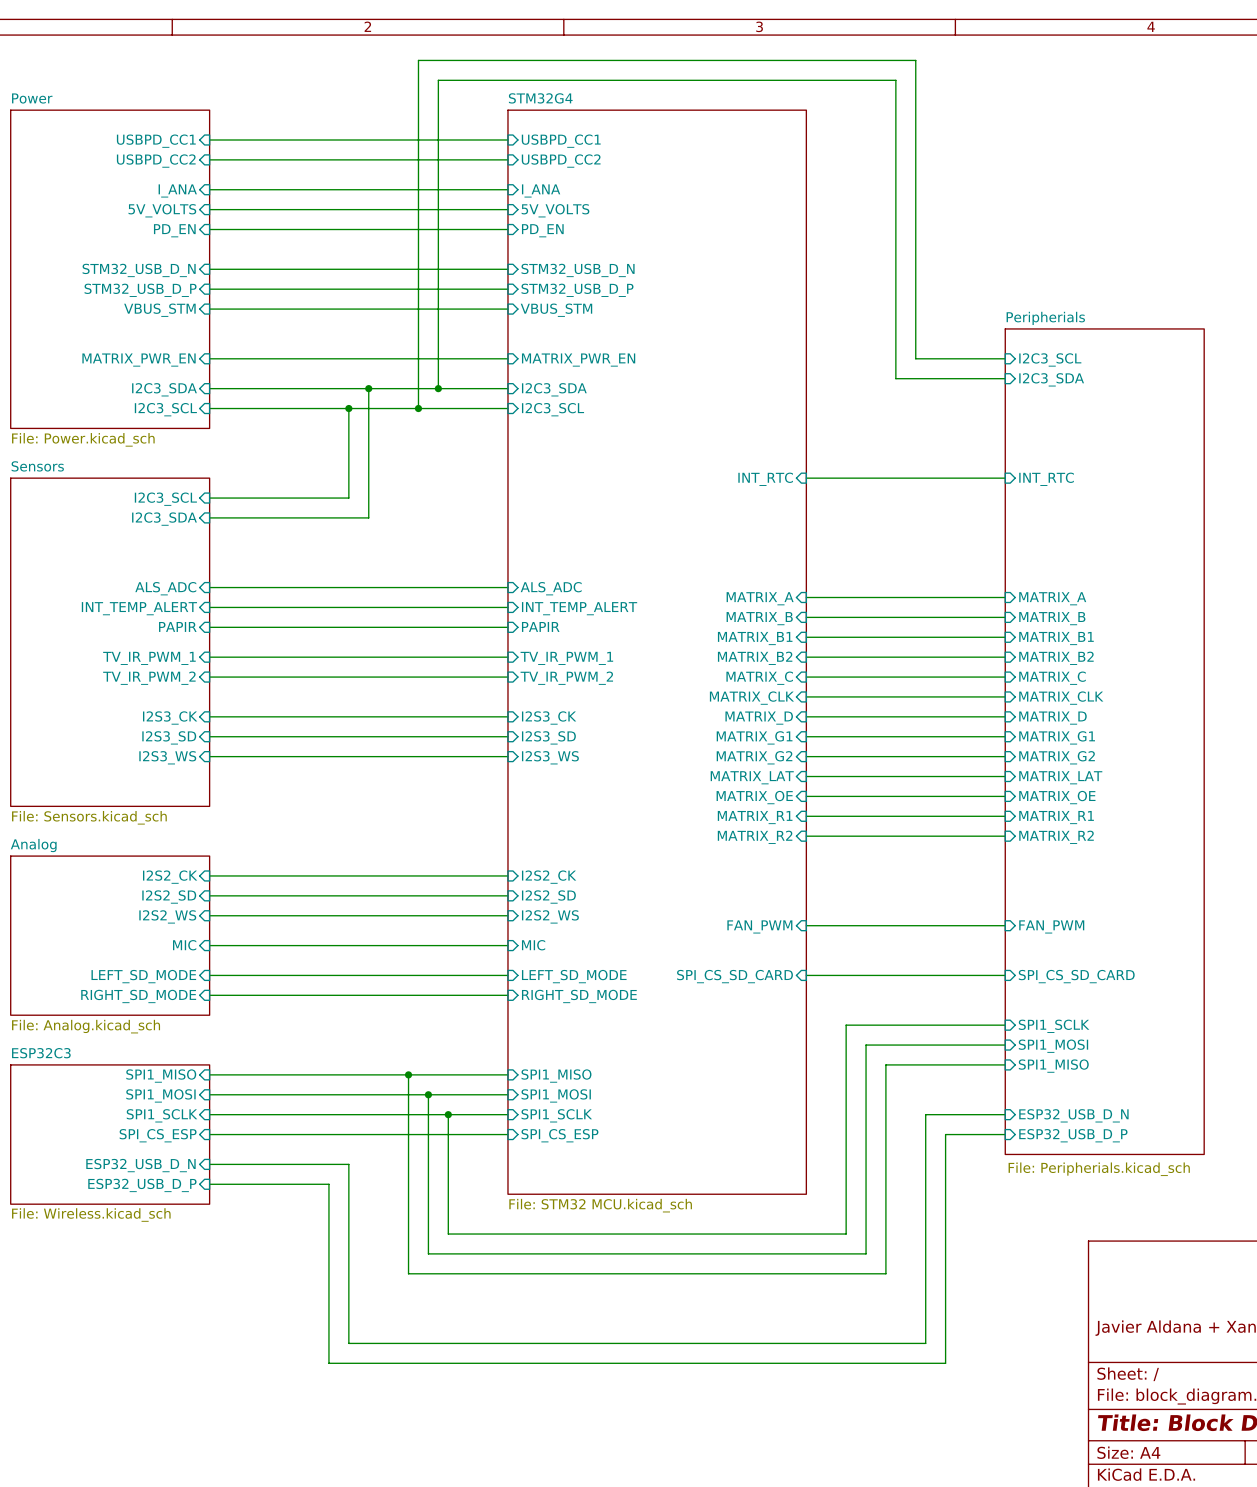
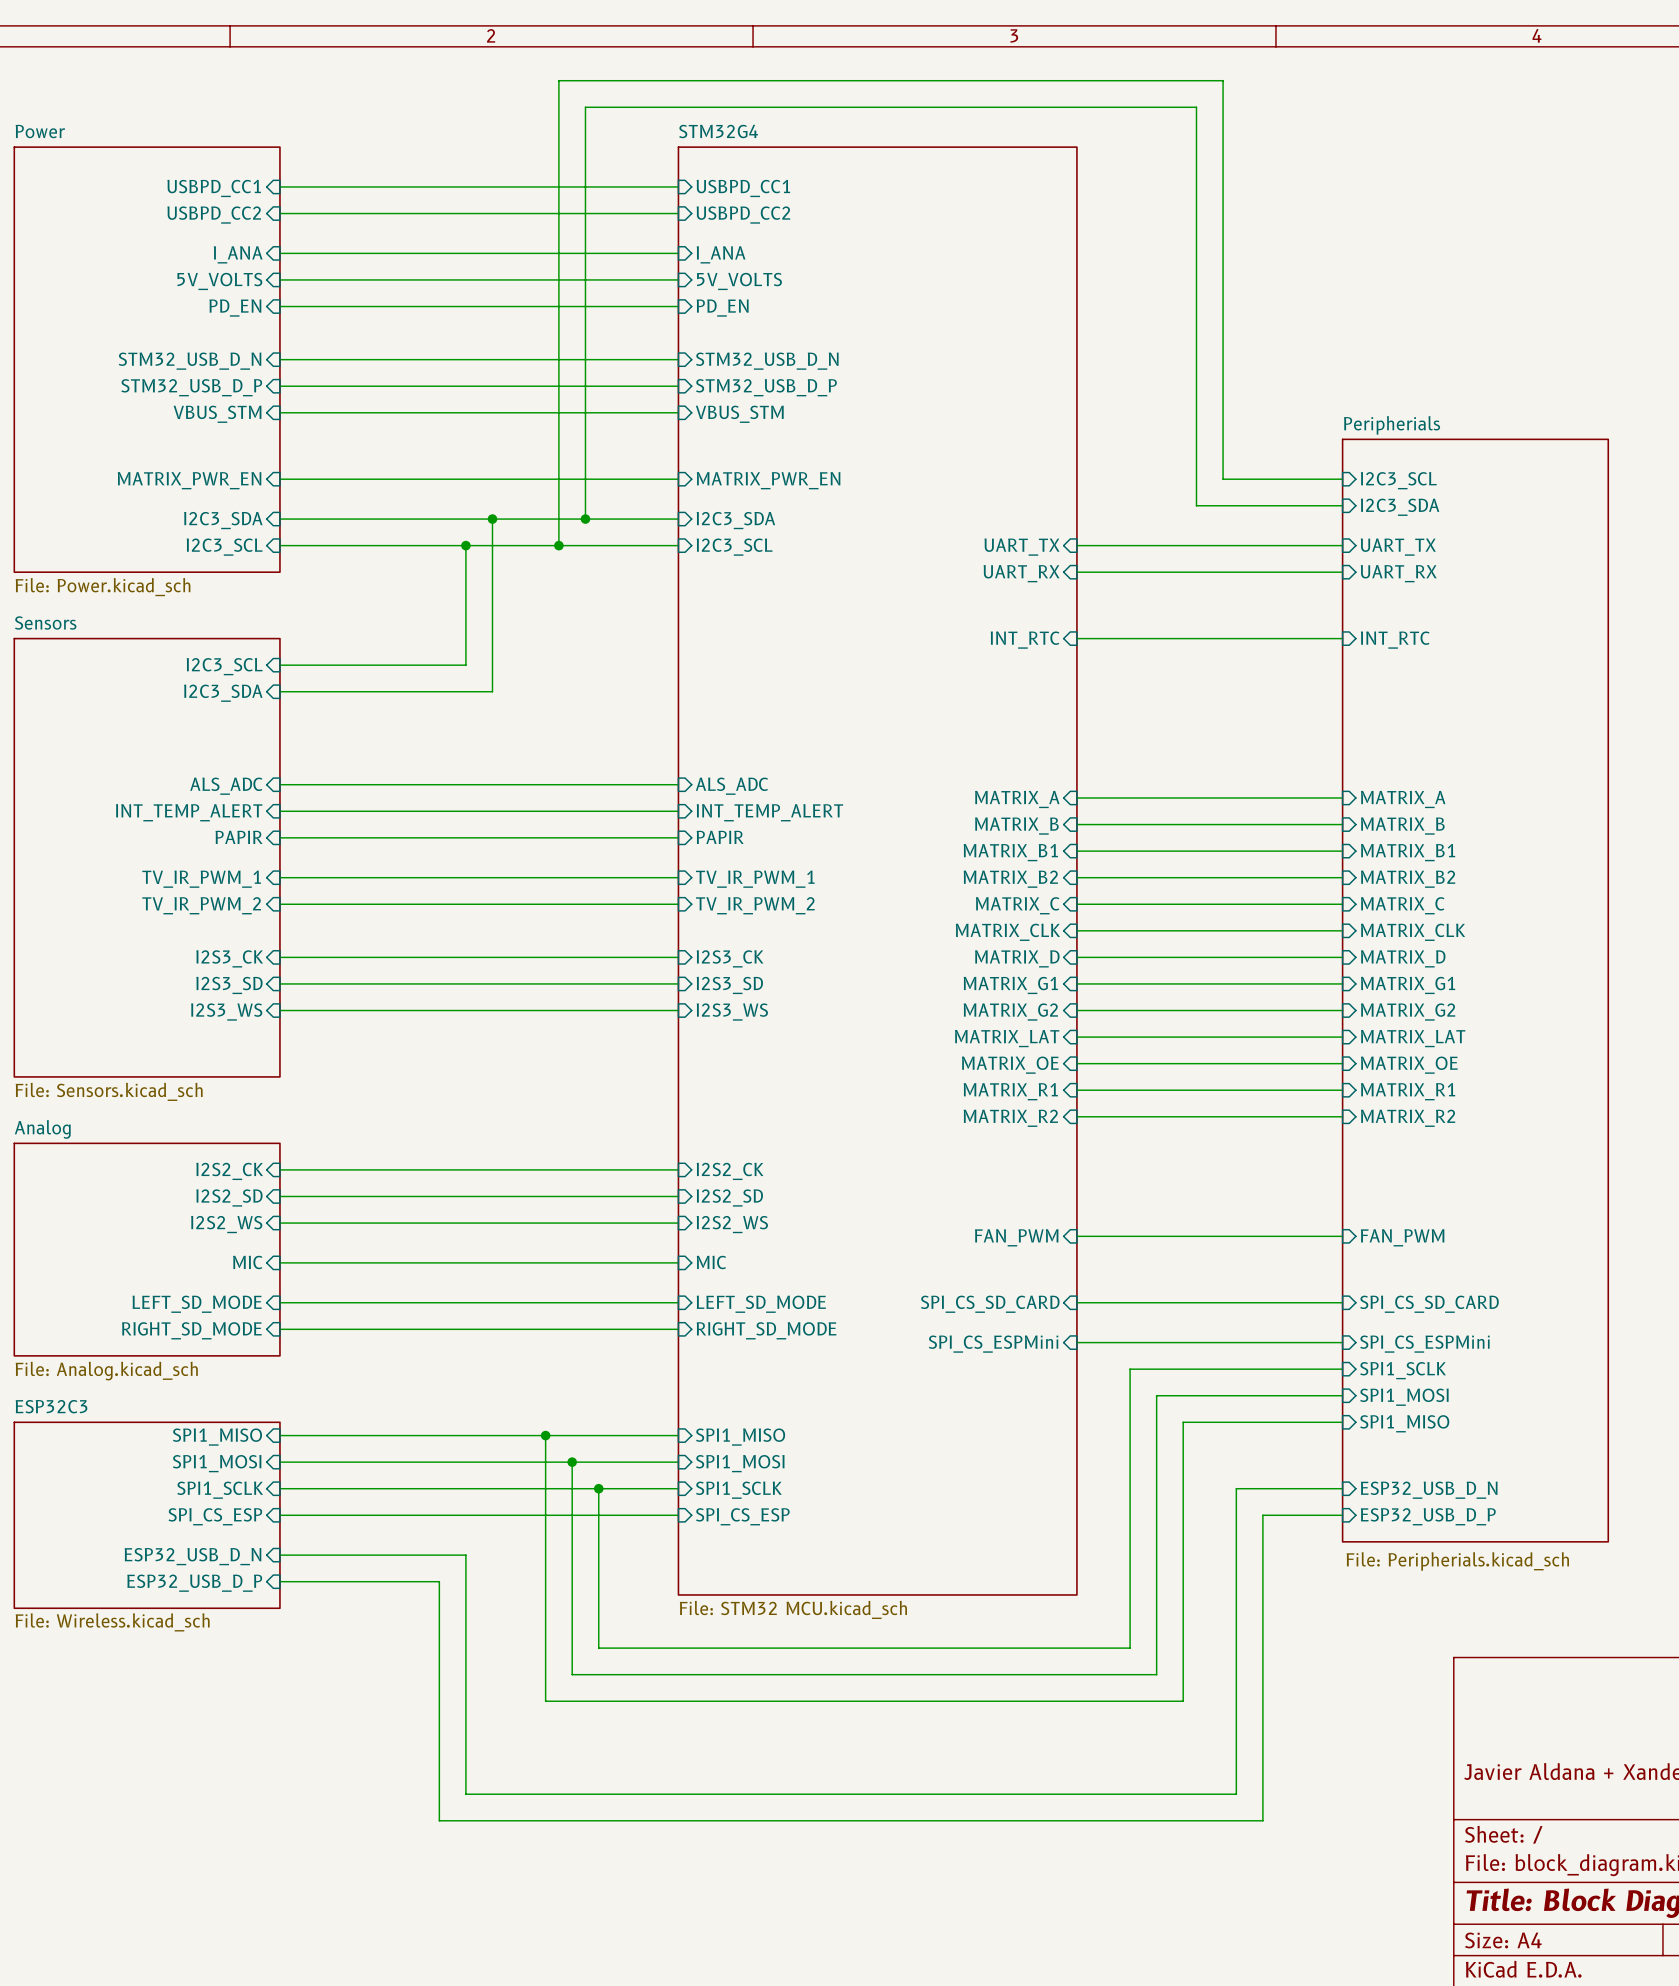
wire: none -> (1076, 545) (1342, 545)
sheet pin: none -> UART_TX (1021, 547)
sheet pin: none -> UART_TX (1398, 547)
wire: none -> (1076, 572) (1342, 572)
sheet pin: none -> UART_RX (1021, 573)
sheet pin: none -> UART_RX (1398, 573)
wire: none -> (1076, 1342) (1342, 1342)
sheet pin: none -> SPI_CS_ESPMini (993, 1344)
sheet pin: none -> SPI_CS_ESPMini (1424, 1344)

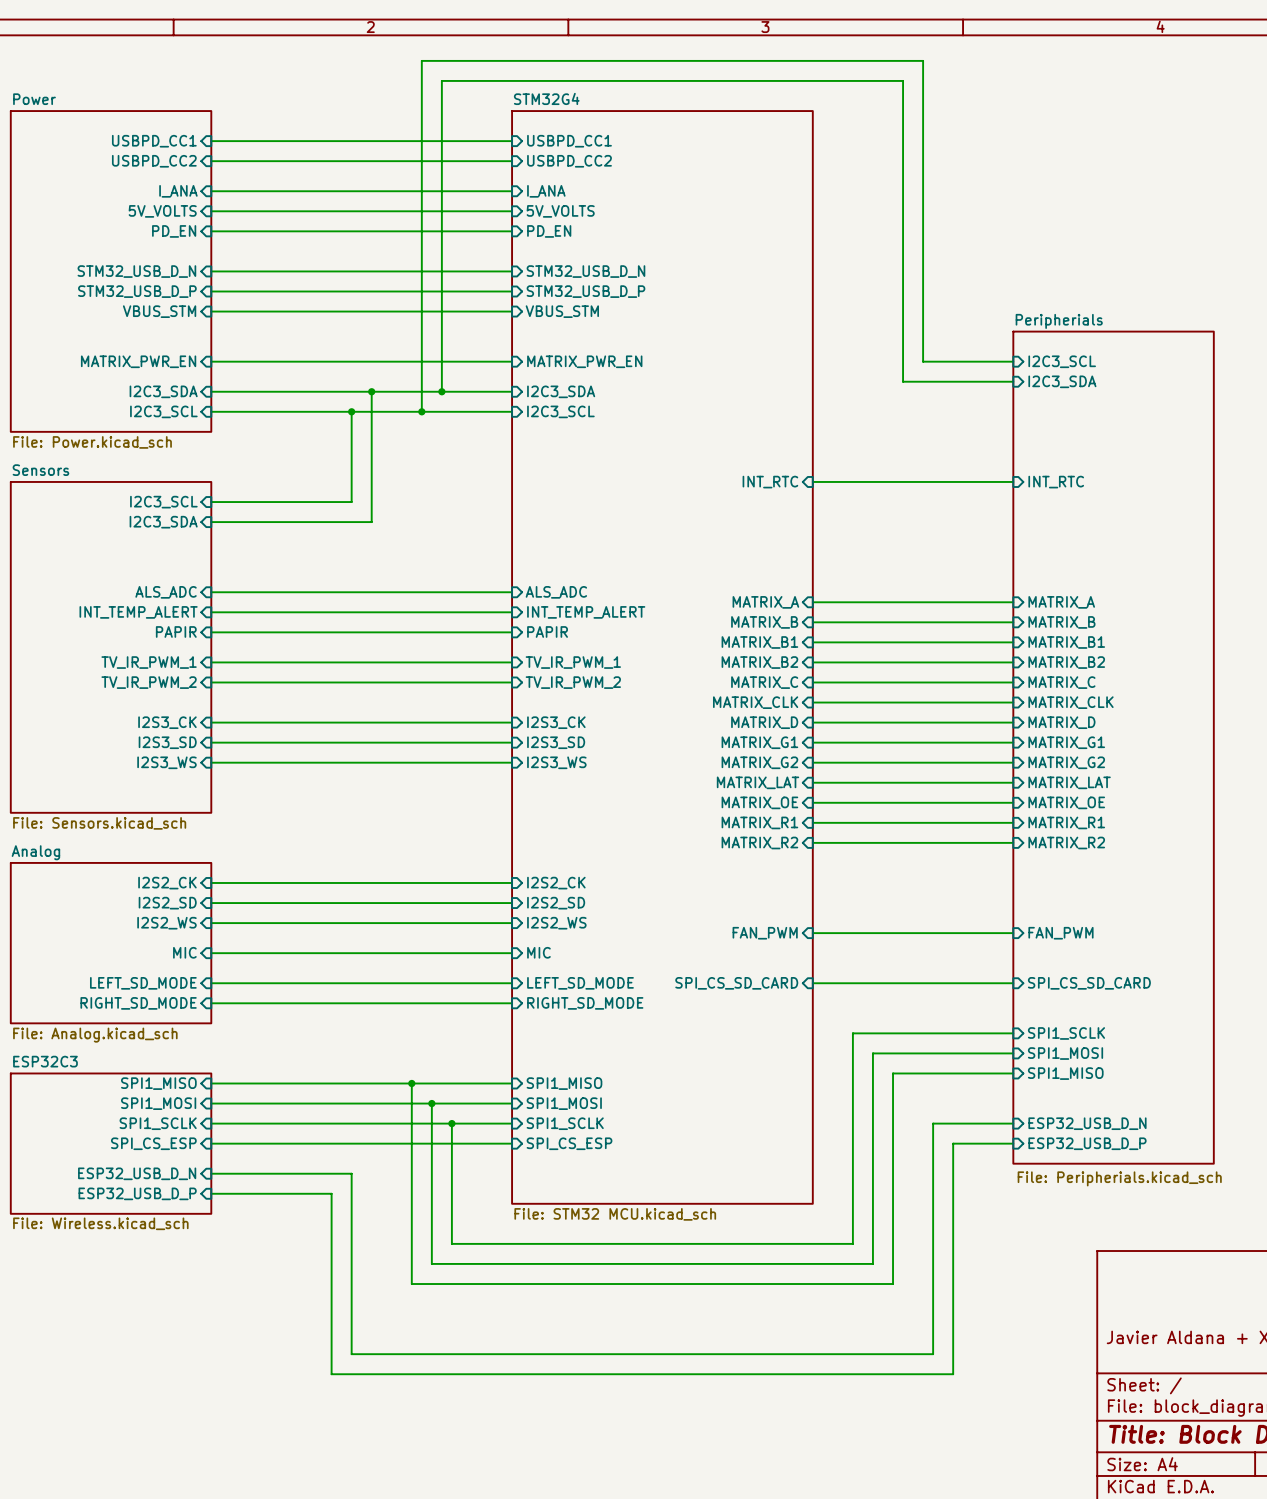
wire: (1076, 545) (1342, 545) -> none
sheet pin: UART_TX (1021, 547) -> none
sheet pin: UART_TX (1398, 547) -> none
wire: (1076, 572) (1342, 572) -> none
sheet pin: UART_RX (1021, 573) -> none
sheet pin: UART_RX (1398, 573) -> none
wire: (1076, 1342) (1342, 1342) -> none
sheet pin: SPI_CS_ESPMini (993, 1344) -> none
sheet pin: SPI_CS_ESPMini (1424, 1344) -> none

